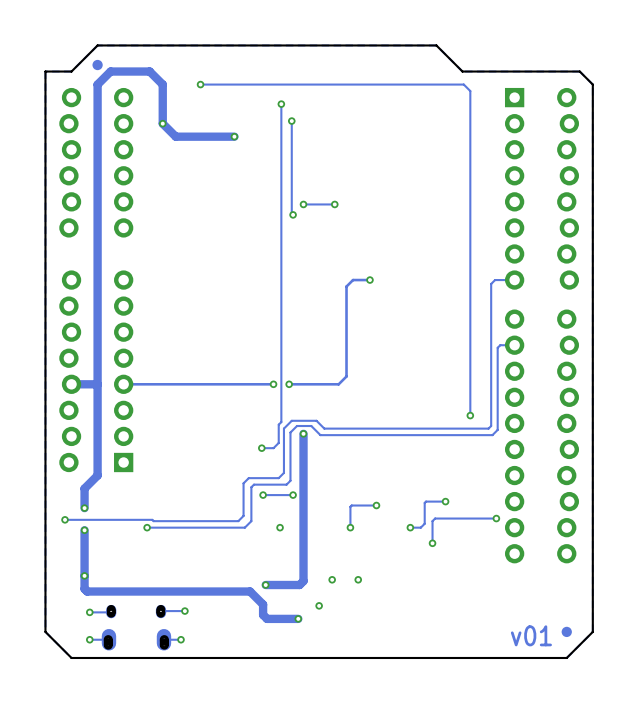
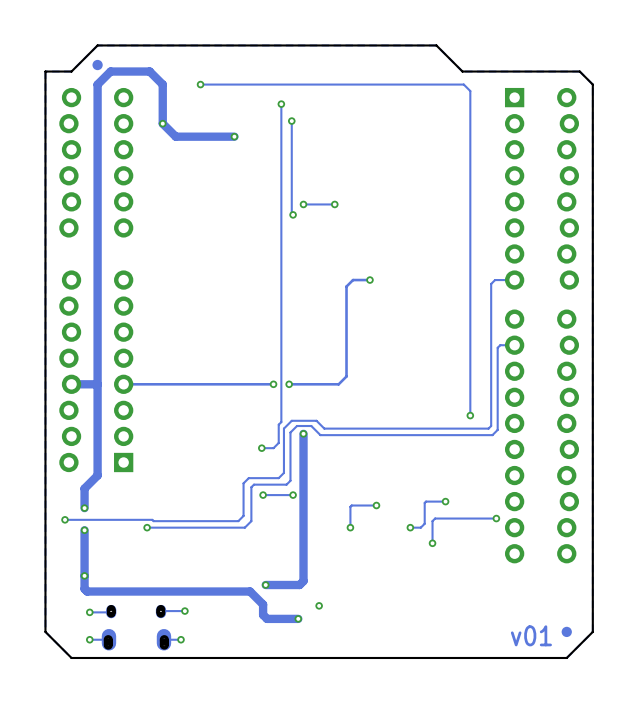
part: (280, 527) -> none
part: (332, 579) -> none
part: (358, 579) -> none

